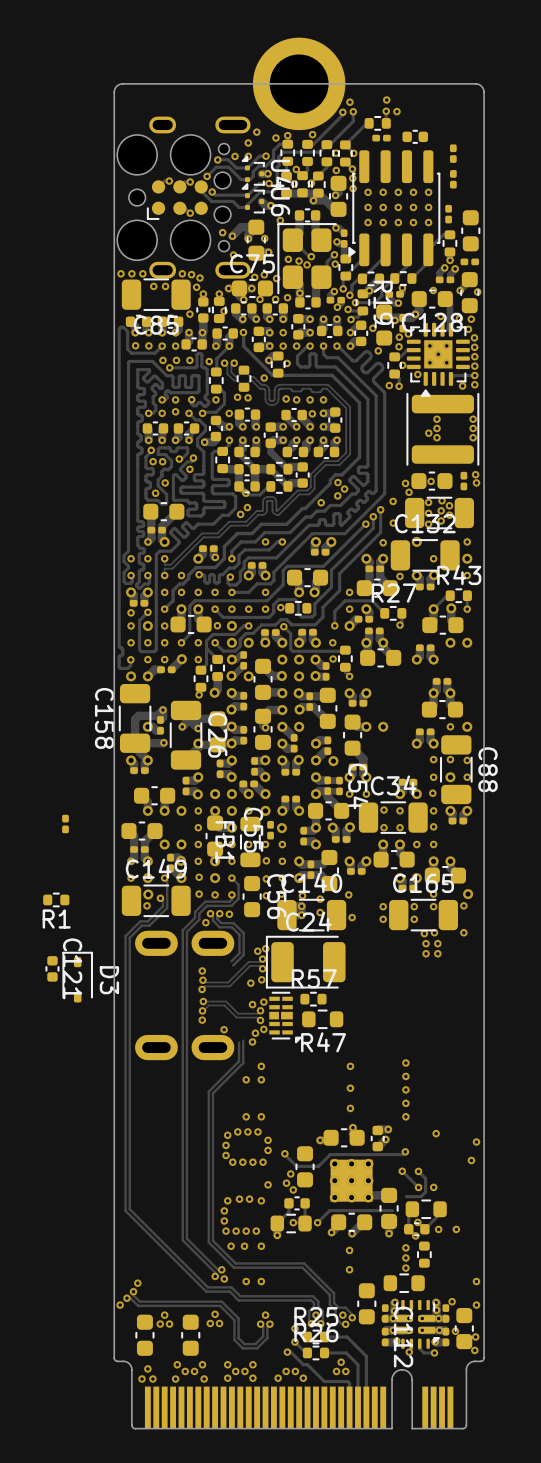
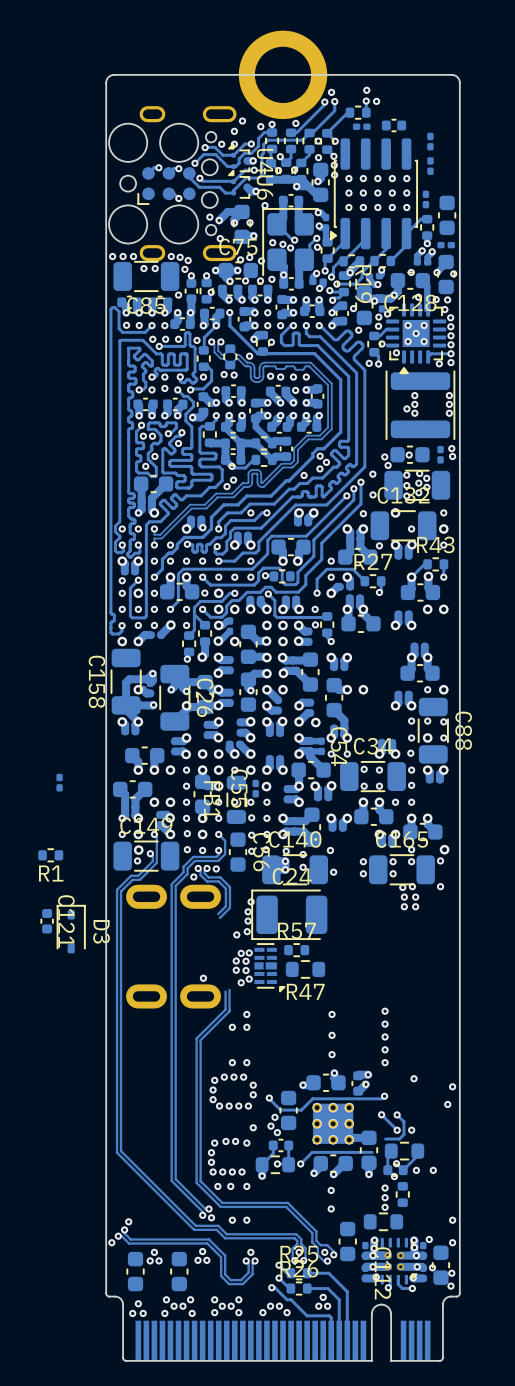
via: (257, 951) -> none
track: (262, 959) (259, 961) (248, 961) (228, 982) (205, 982) (202, 980) -> none
track: (262, 968) (259, 965) (250, 965) (229, 986) (205, 986) (202, 989) -> none
via: (202, 971) -> none
via: (202, 980) -> none
via: (202, 989) -> none
track: (203, 1001) (226, 1001) (238, 1013) (257, 1013) (260, 1010) -> none
via: (203, 1001) -> none
via: none -> (241, 953)
via: (252, 1004) -> none
track: (202, 1010) (208, 1005) (224, 1005) (236, 1017) (257, 1017) (260, 1020) -> none
via: (202, 1010) -> none
via: none -> (236, 961)
via: (202, 1020) -> none
via: none -> (236, 970)
via: none -> (203, 978)
via: (224, 1029) -> none
via: (252, 1042) -> none

